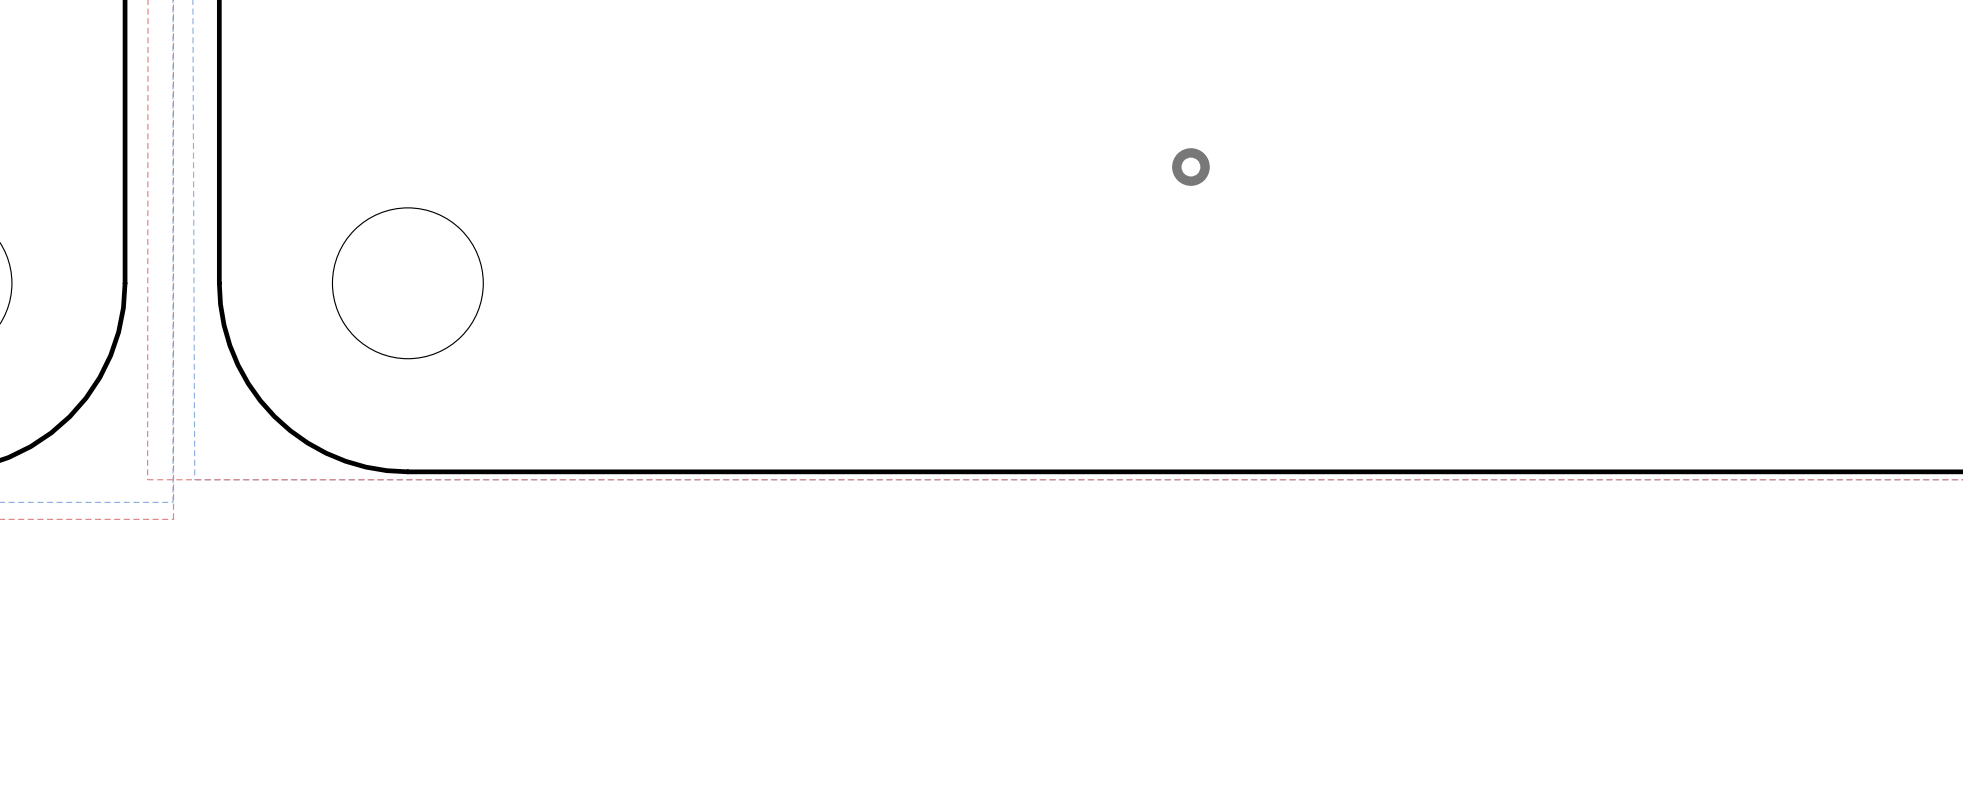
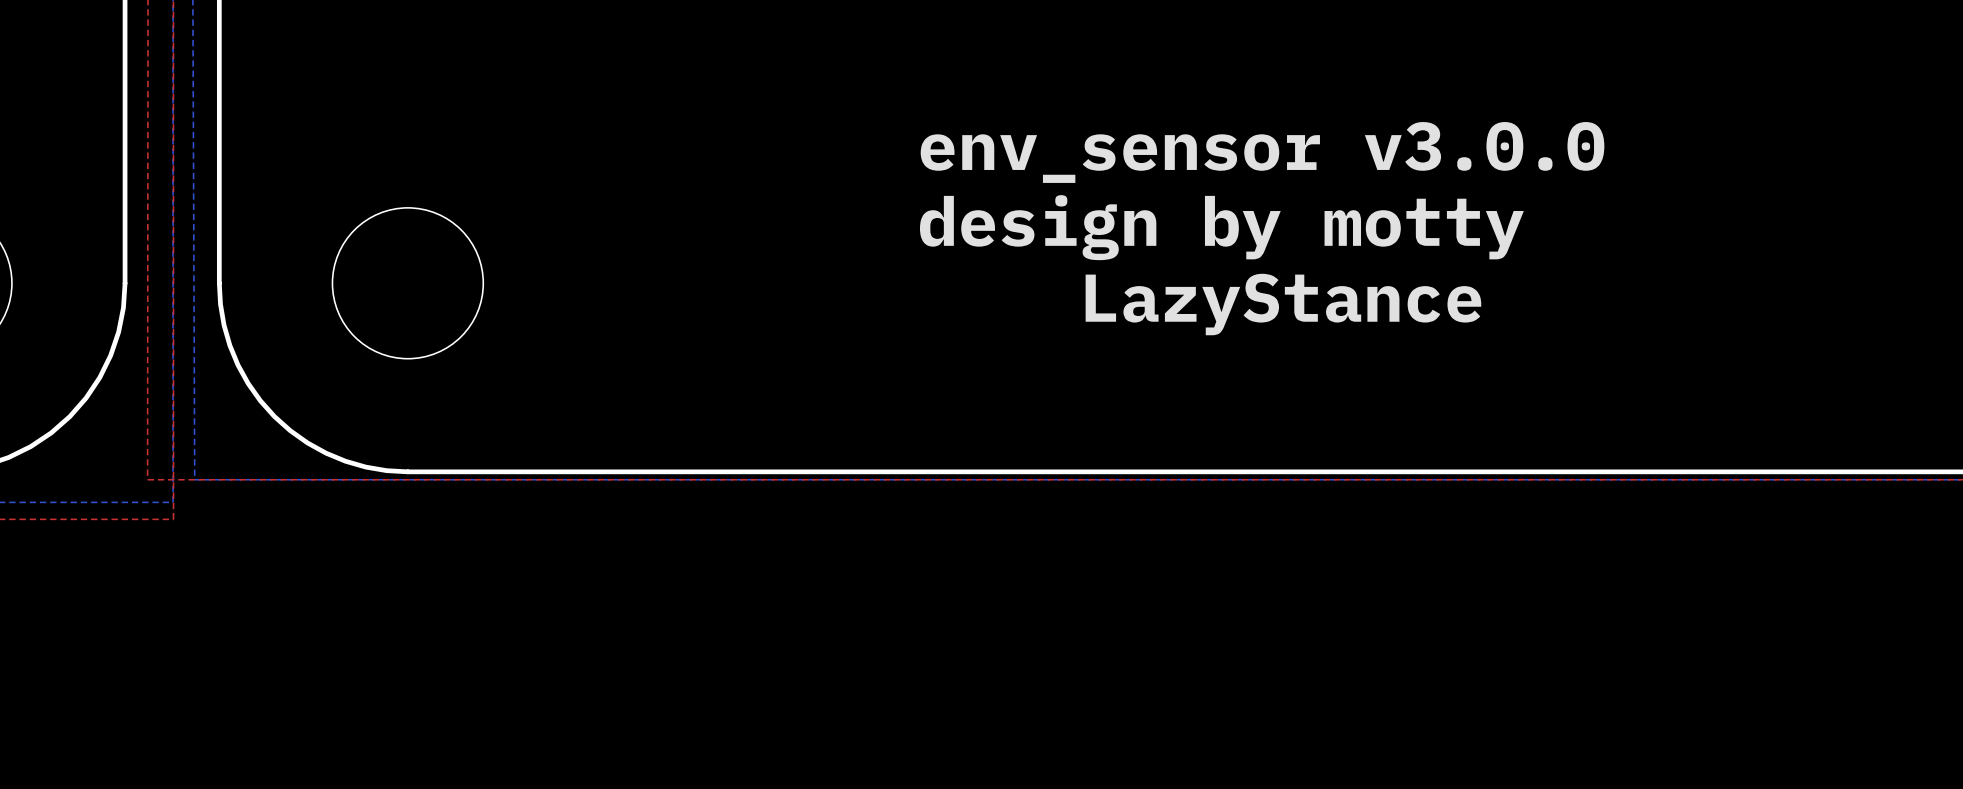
text: none -> env_sensor v3.0.0 (1262, 152)
via: (1190, 167) -> none
text: none -> design by motty (1221, 227)
text: none -> LazyStance (1283, 304)

